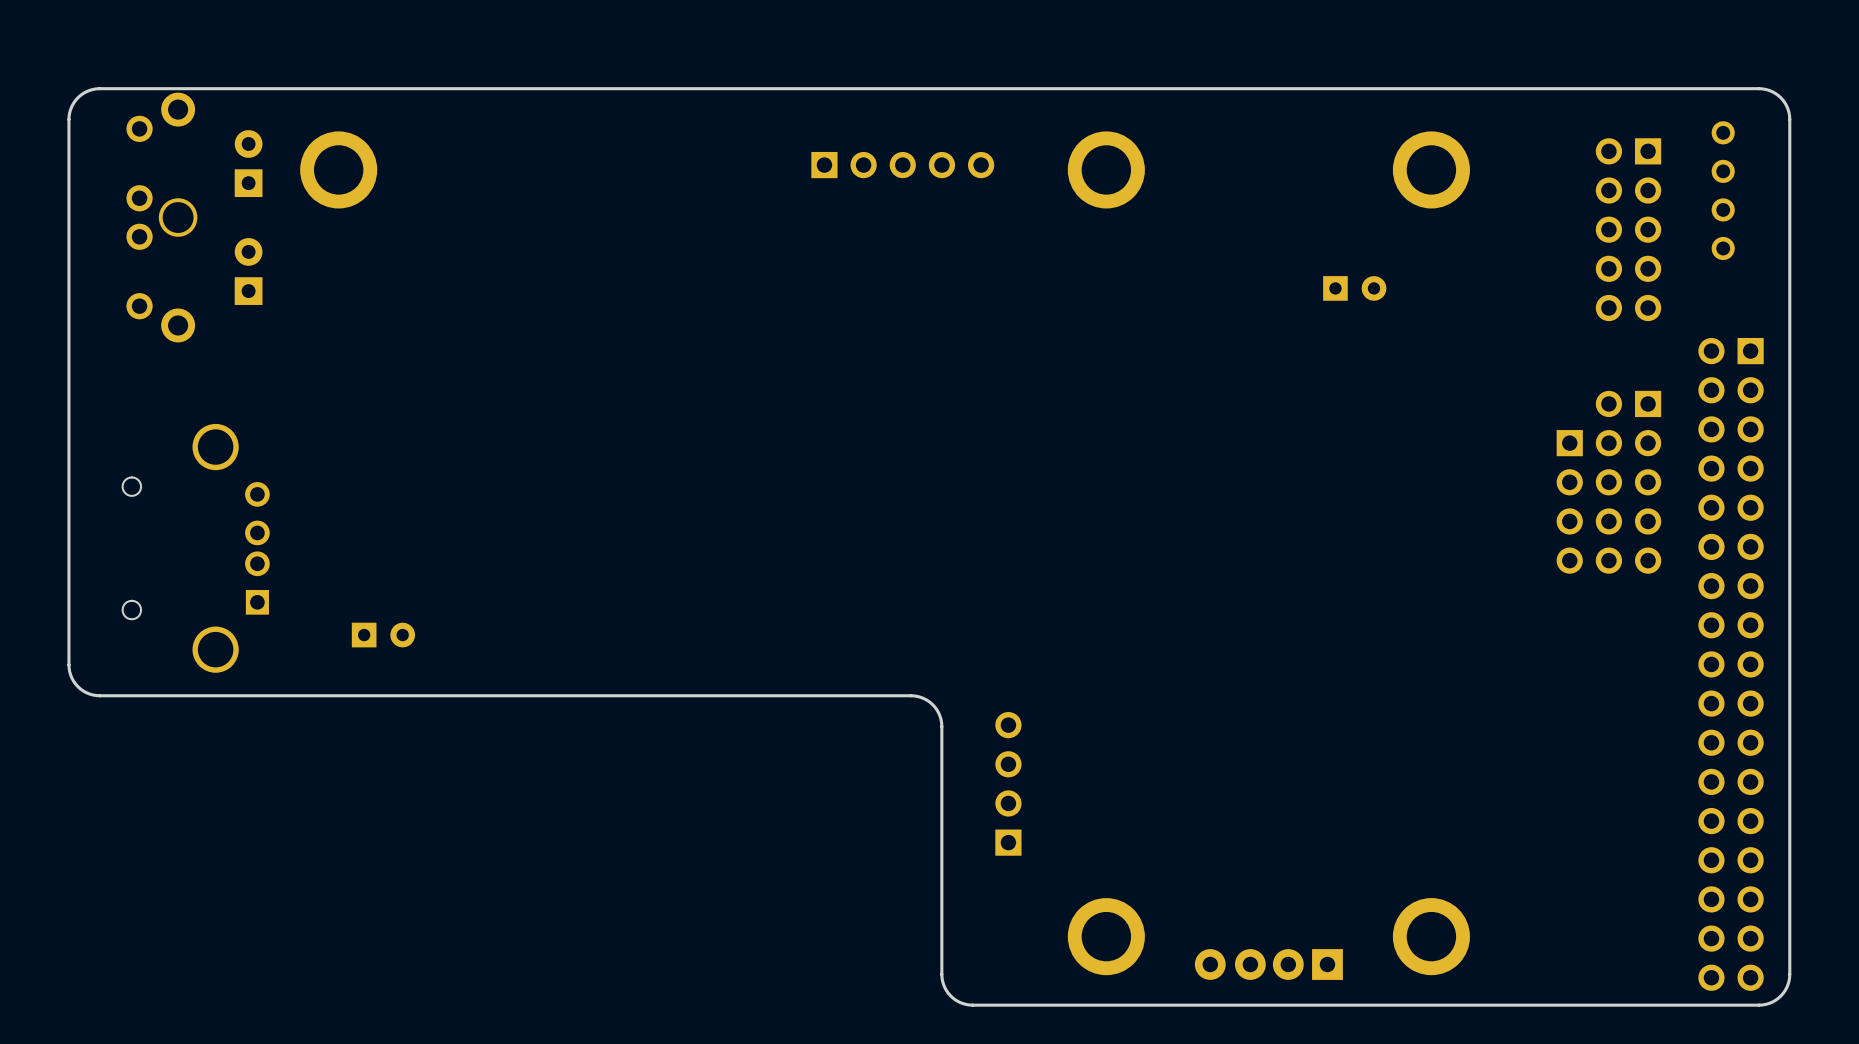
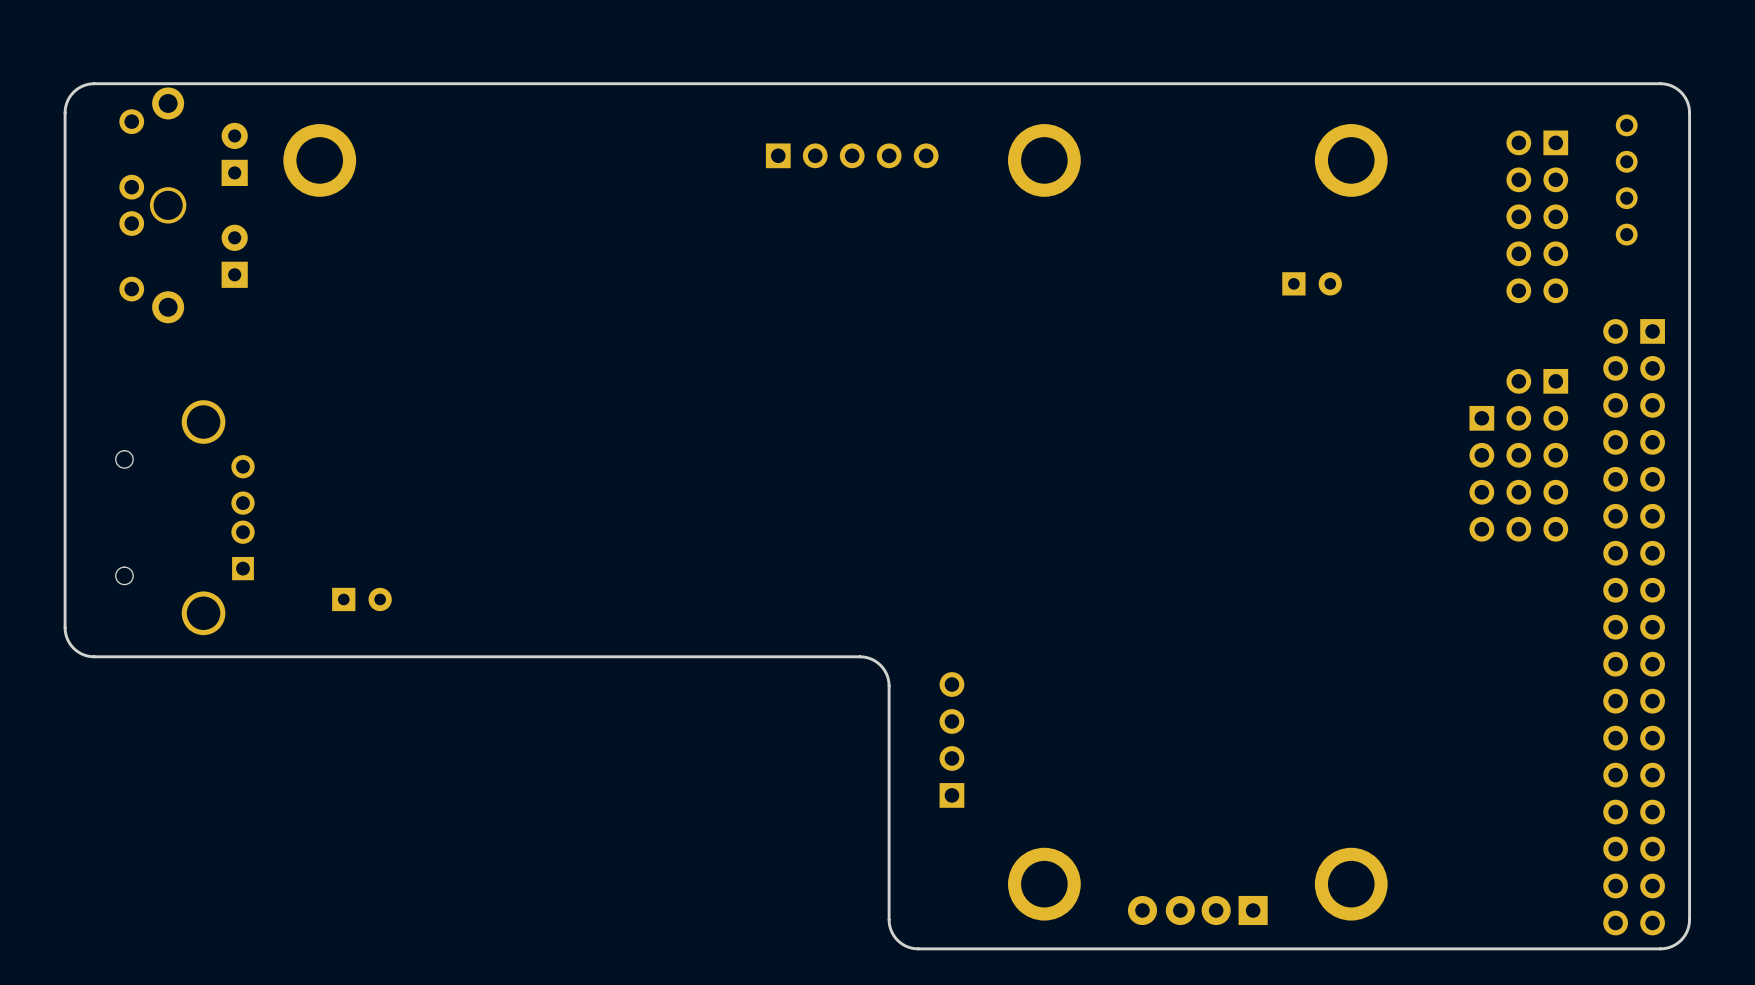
part position: (1354, 288) -> (1312, 283)

